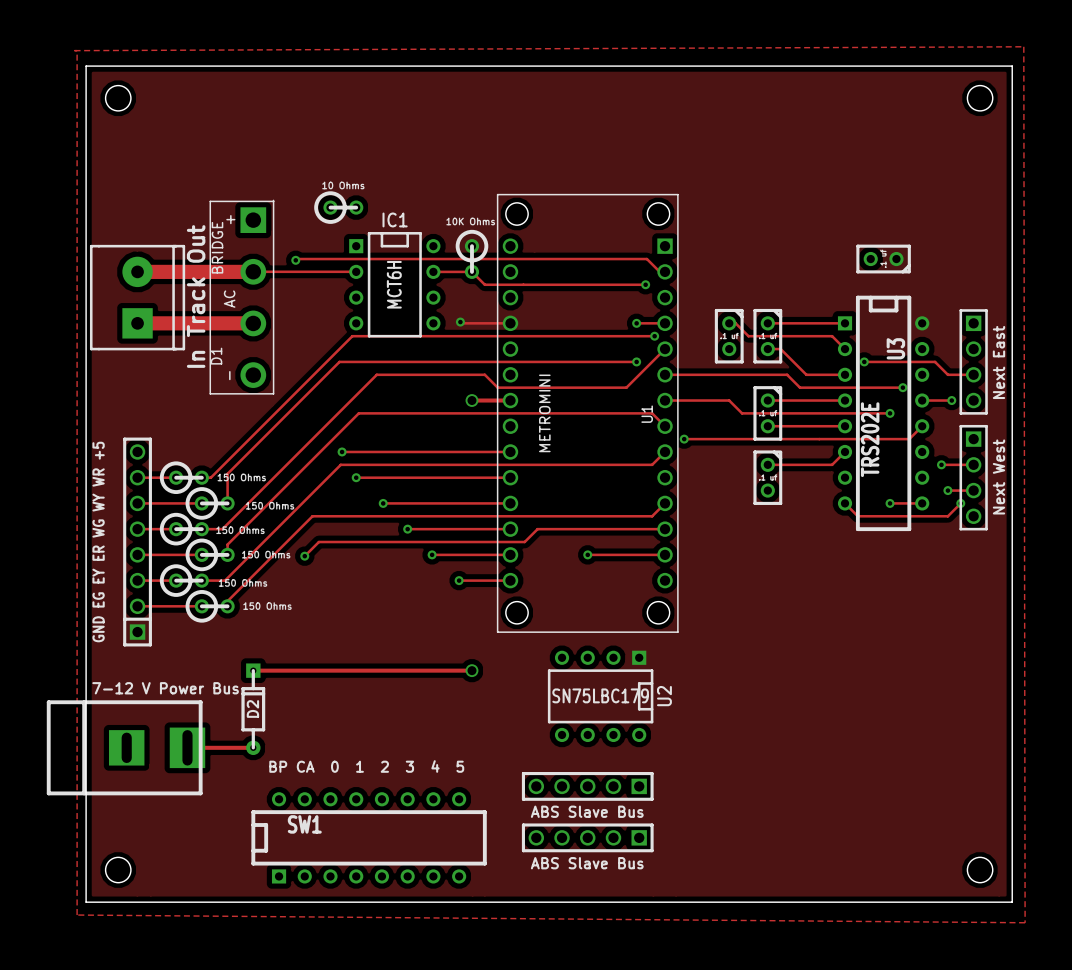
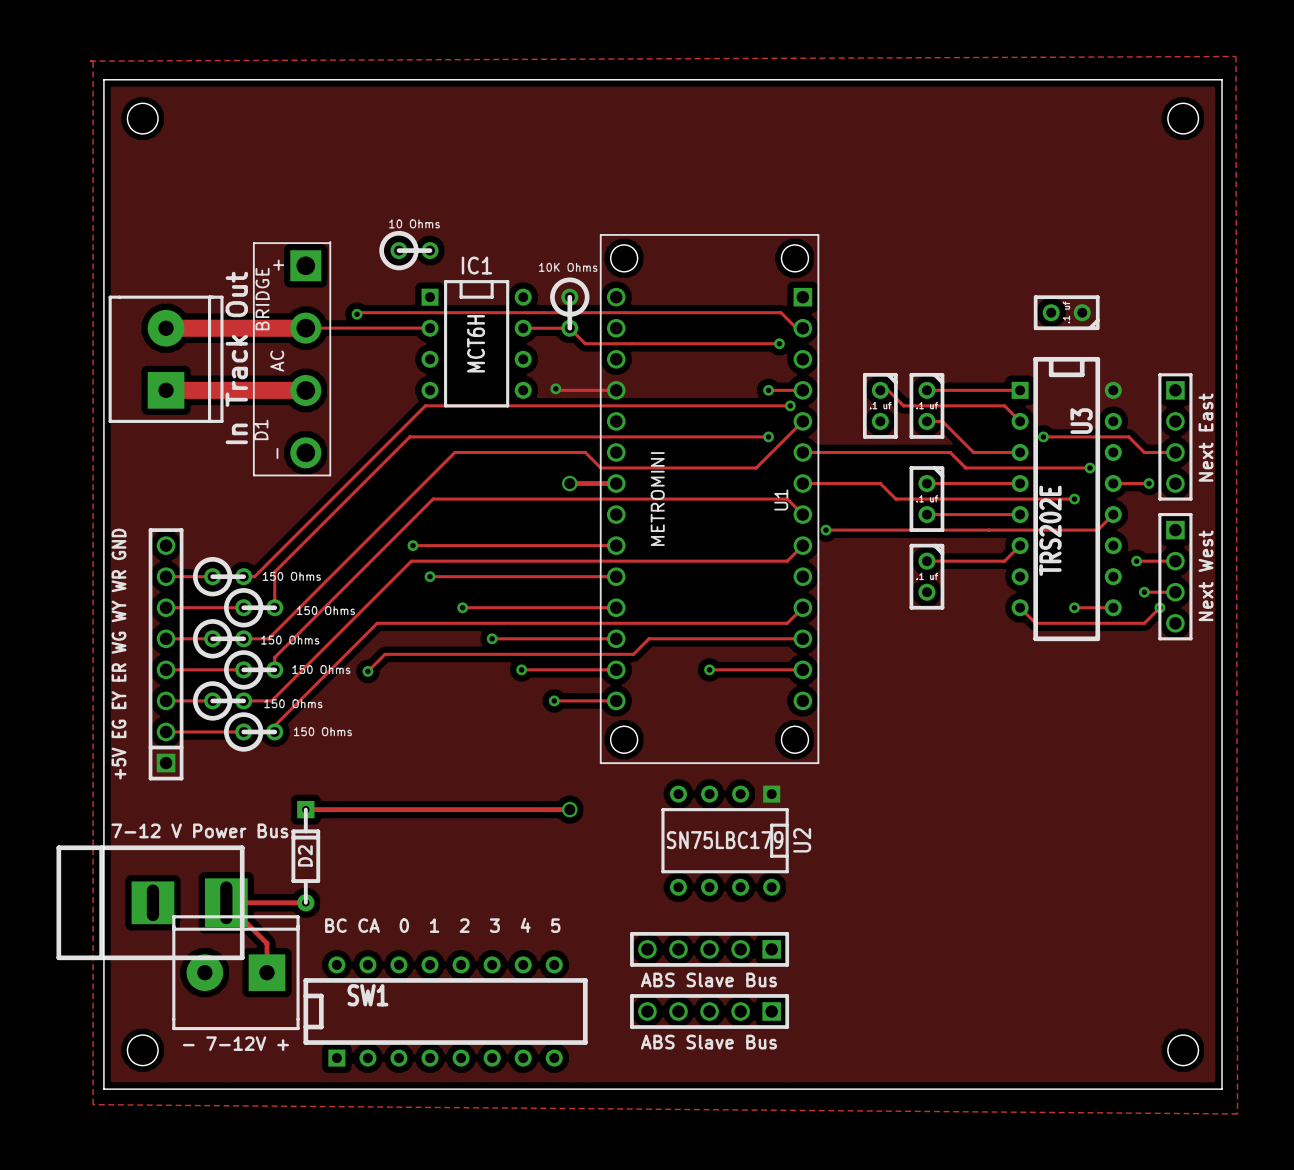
part value: GND EG EY ER WG WY WR +5 (98, 542) -> +5V EG EY ER WG WY WR GND (119, 654)
track: none -> (226, 902) (266, 943) (266, 972)
SW1 value: BP CA 0 1 2 3 4 5 (366, 766) -> BC CA 0 1 2 3 4 5 (442, 925)
part: none -> - 7-12V + (235, 972)

